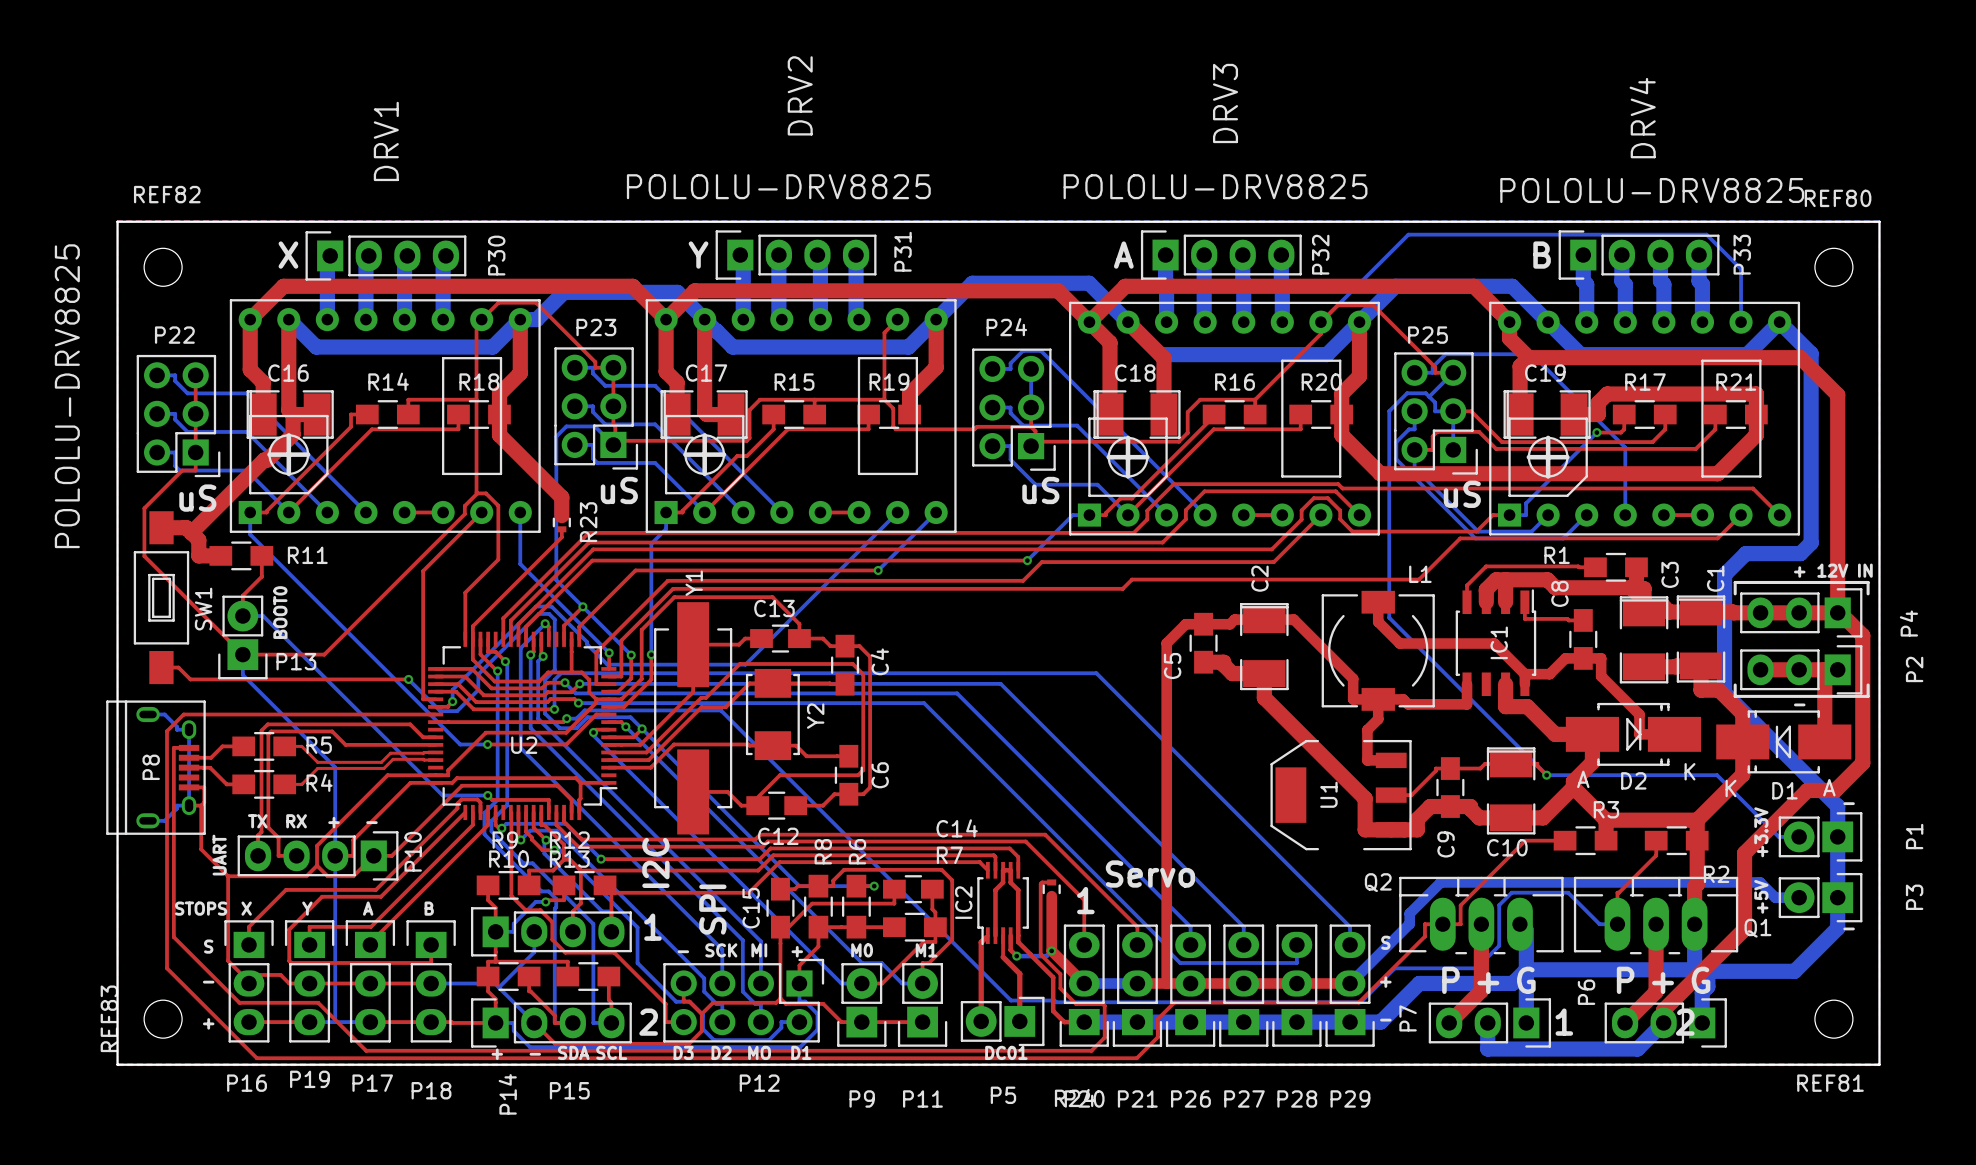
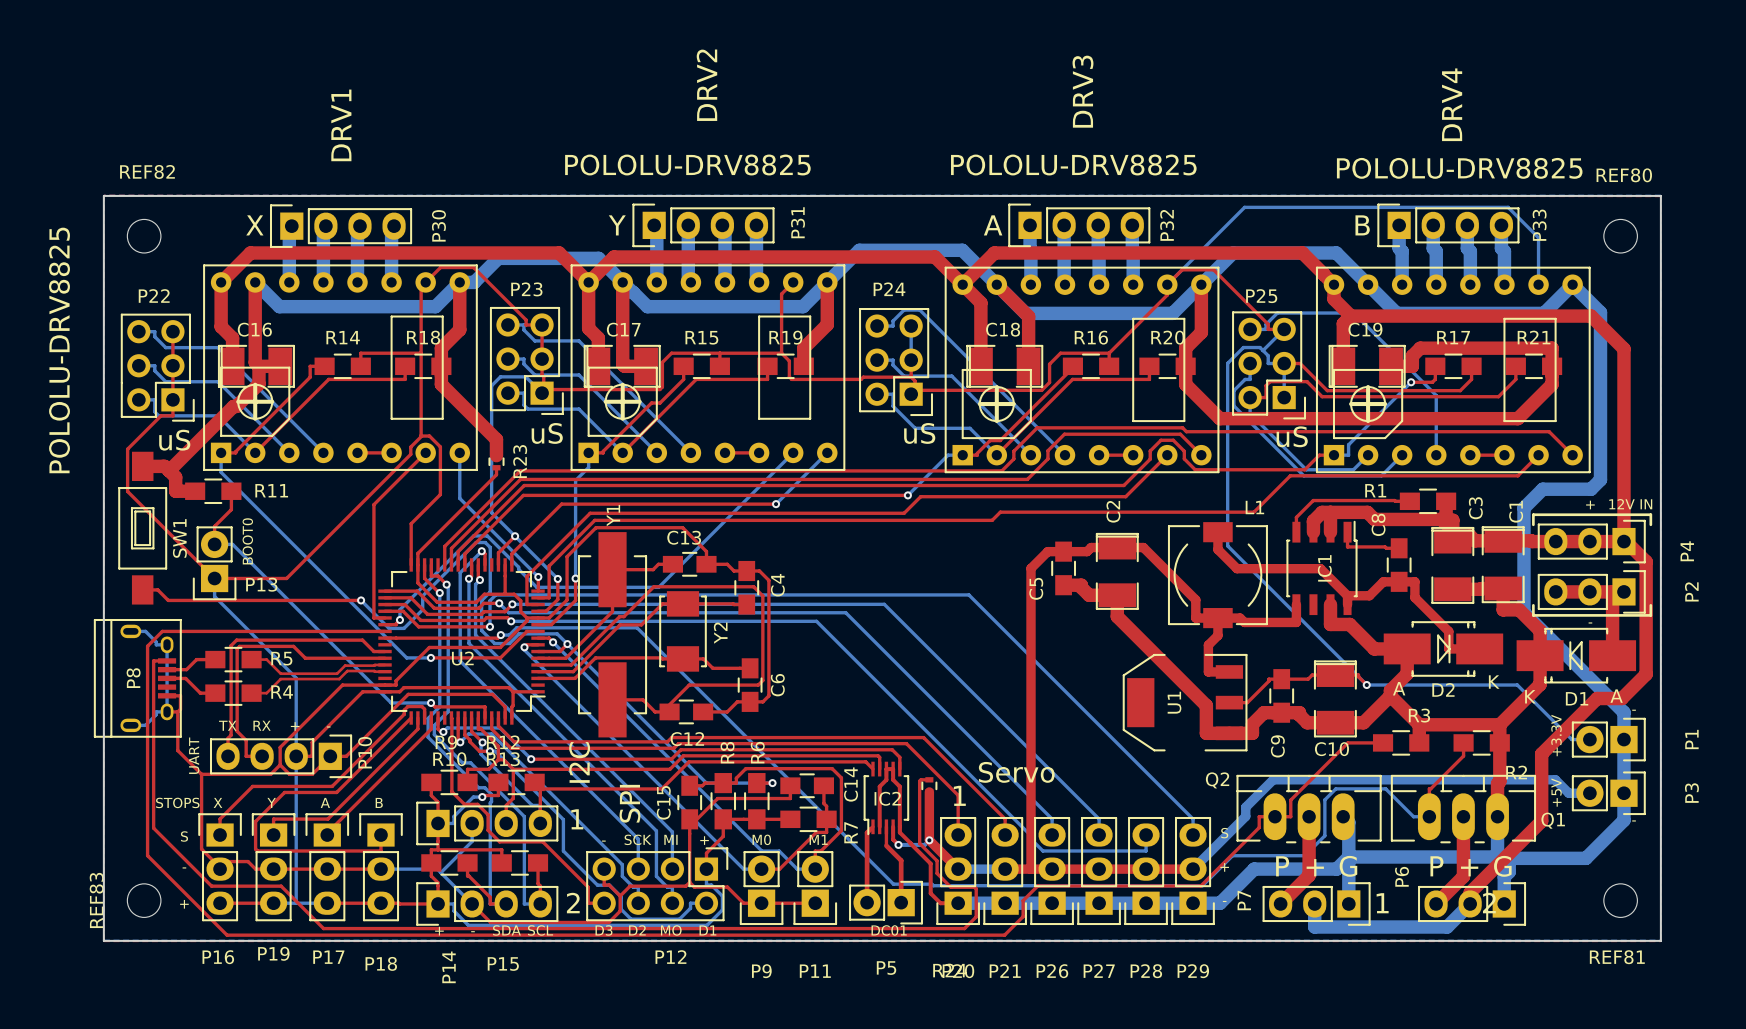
C14 name rotation: 0° (957, 828) -> 90° counterclockwise (851, 784)
C14 name position: C14 (957, 828) -> C14 (851, 784)
R7 name rotation: 0° (949, 855) -> 90° counterclockwise (851, 832)
R7 name position: R7 (949, 855) -> R7 (851, 832)
IC2 name rotation: 0° (963, 902) -> 90° clockwise (887, 798)

